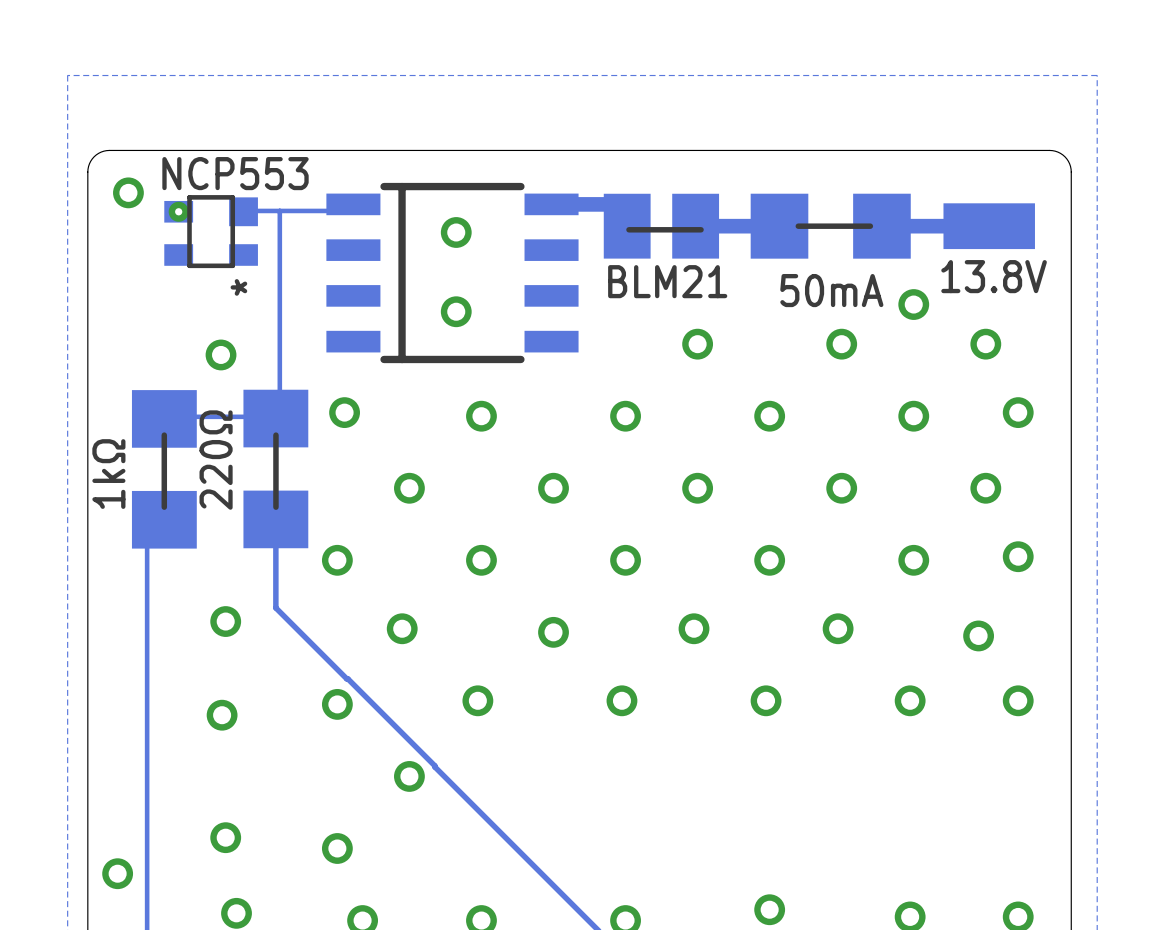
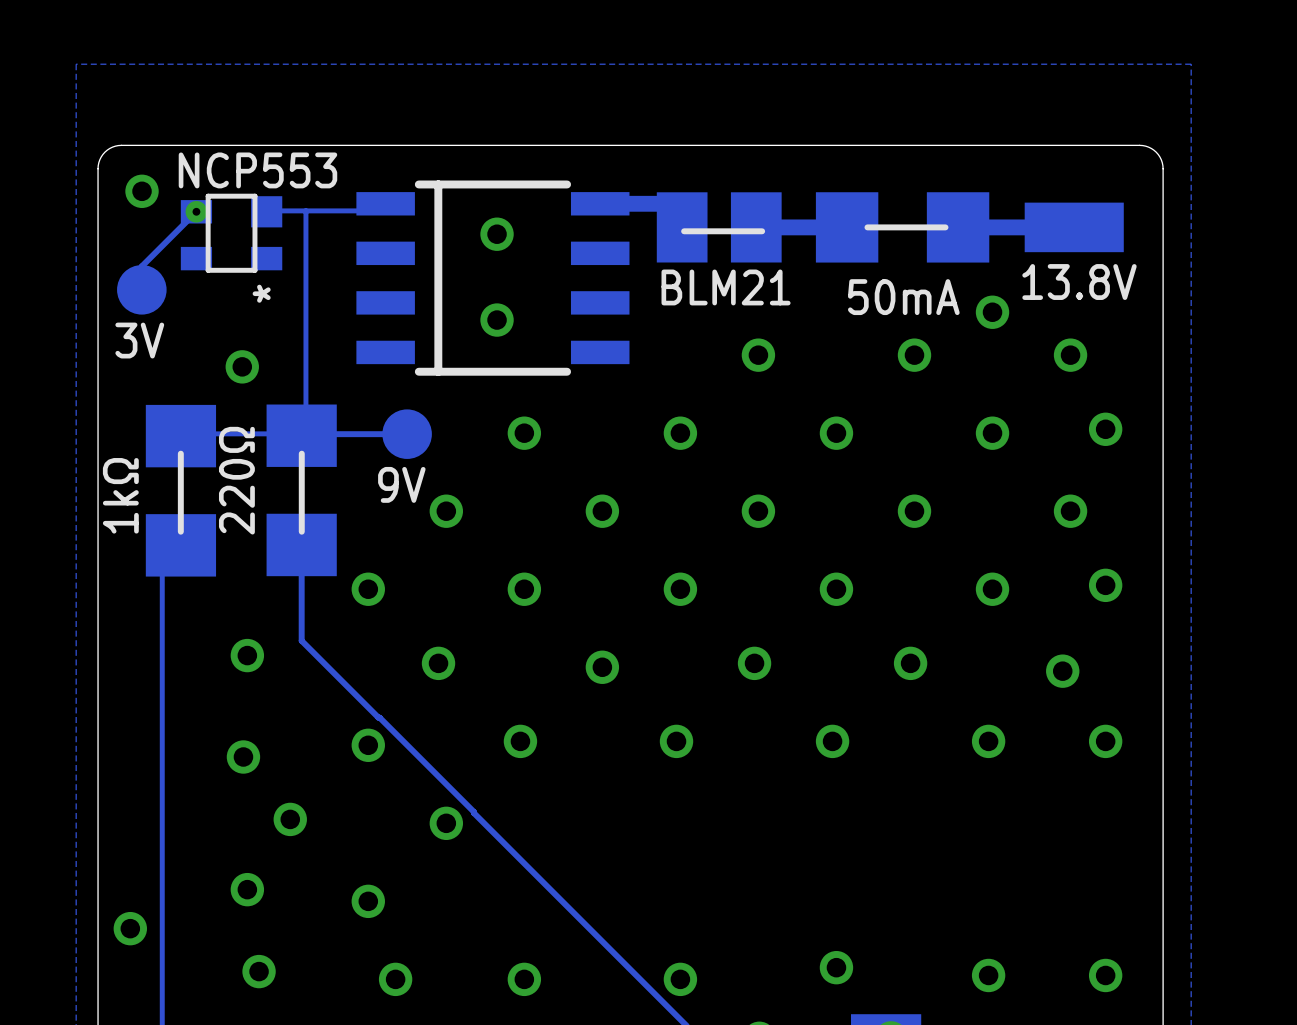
track: none -> (196, 211) (141, 266) (141, 289)
part: none -> (141, 289)
text: none -> 3V (139, 340)
via: (344, 412) -> none
track: none -> (407, 434) (303, 434) (301, 435)
part: none -> (407, 434)
text: none -> 9V (401, 484)
via: none -> (290, 819)

